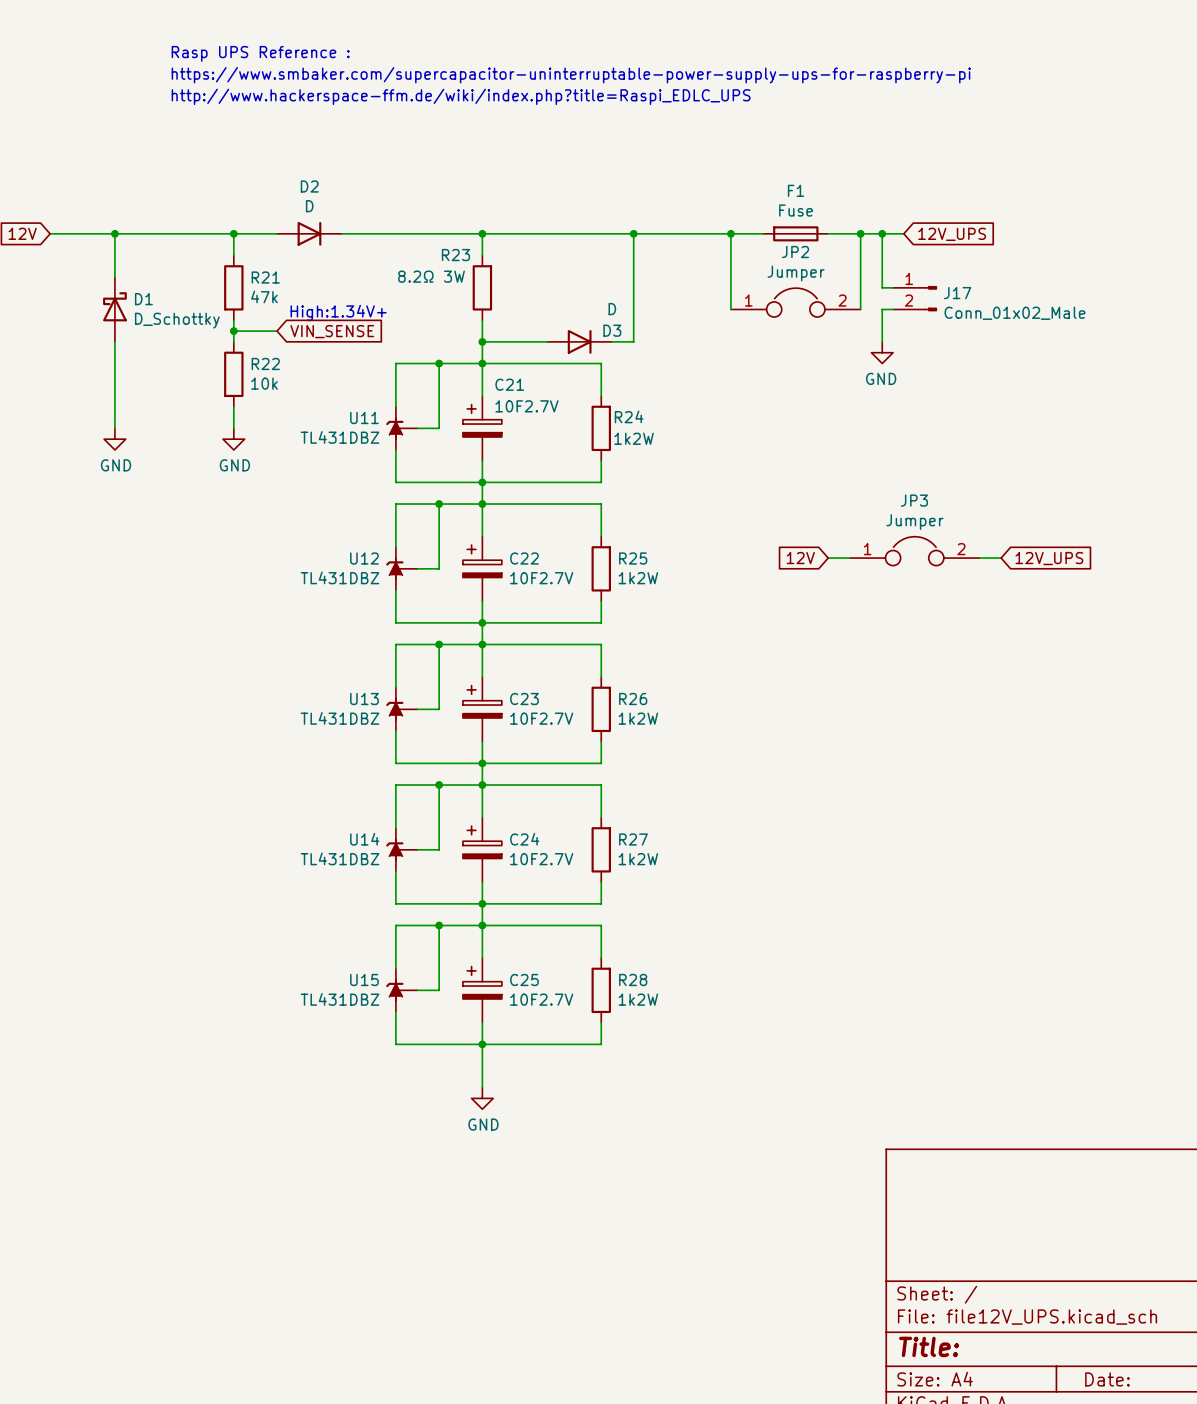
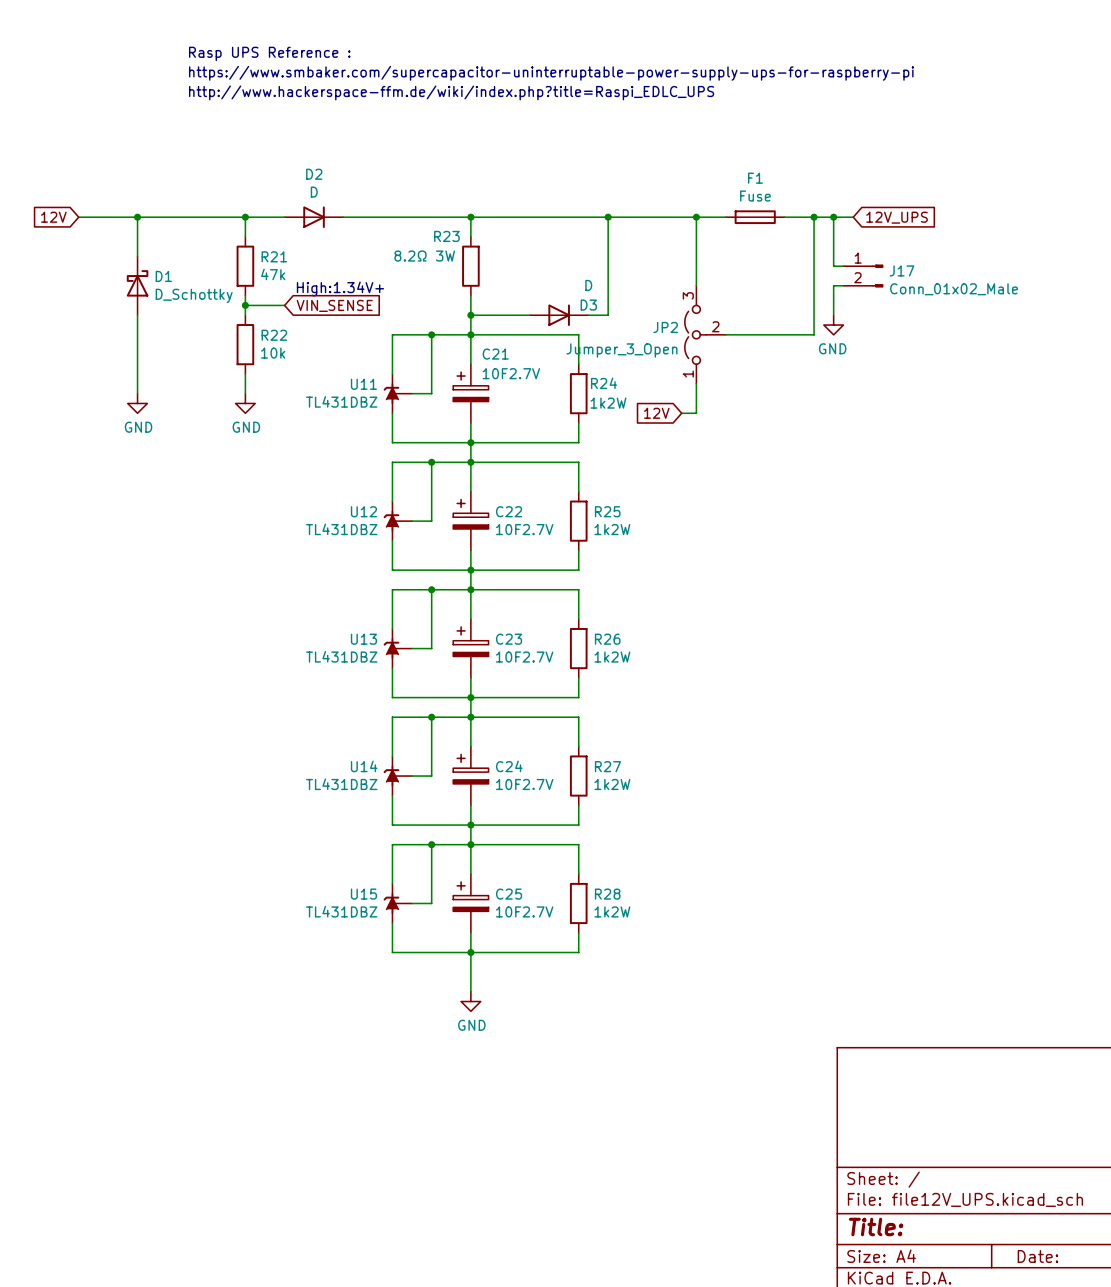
JP2 name position: JP2 (795, 252) -> JP2 (665, 327)
JP2 value: Jumper (796, 273) -> Jumper_3_Open (621, 350)
JP2 symbol: [730, 288, 861, 318] -> [684, 285, 726, 384]
wire: none -> (814, 285) (814, 334) (725, 334)
wire: none -> (696, 383) (696, 413) (681, 413)
JP3: Jumper (914, 551) -> none
global label position: 12V (800, 558) -> 12V (656, 413)
wire: (828, 558) (849, 558) -> none
wire: (979, 558) (1001, 558) -> none
global label: 12V_UPS (1049, 558) -> none

